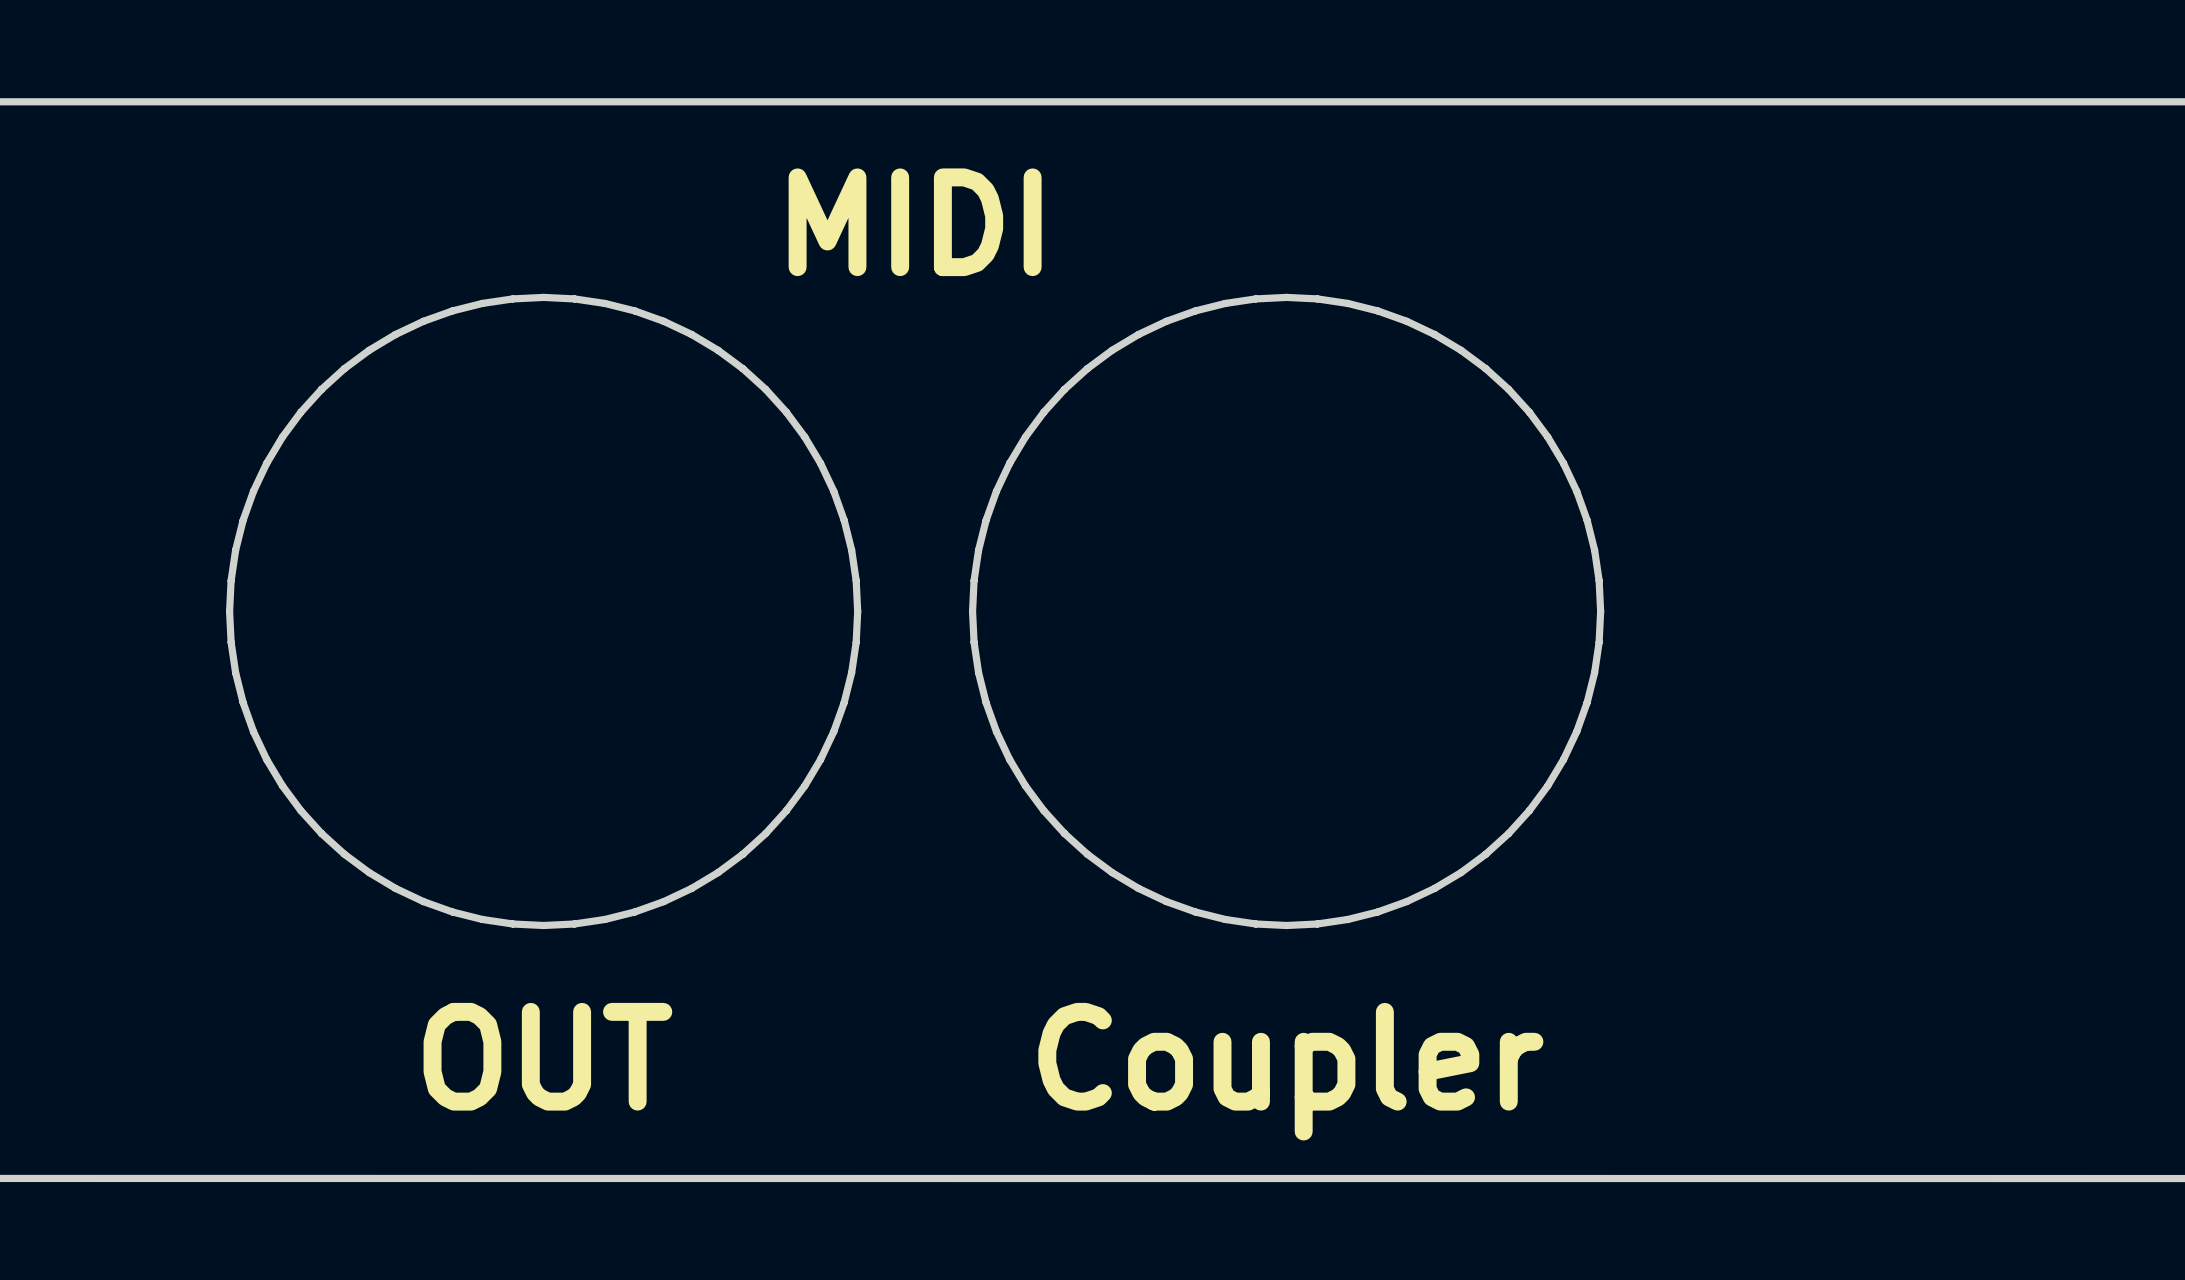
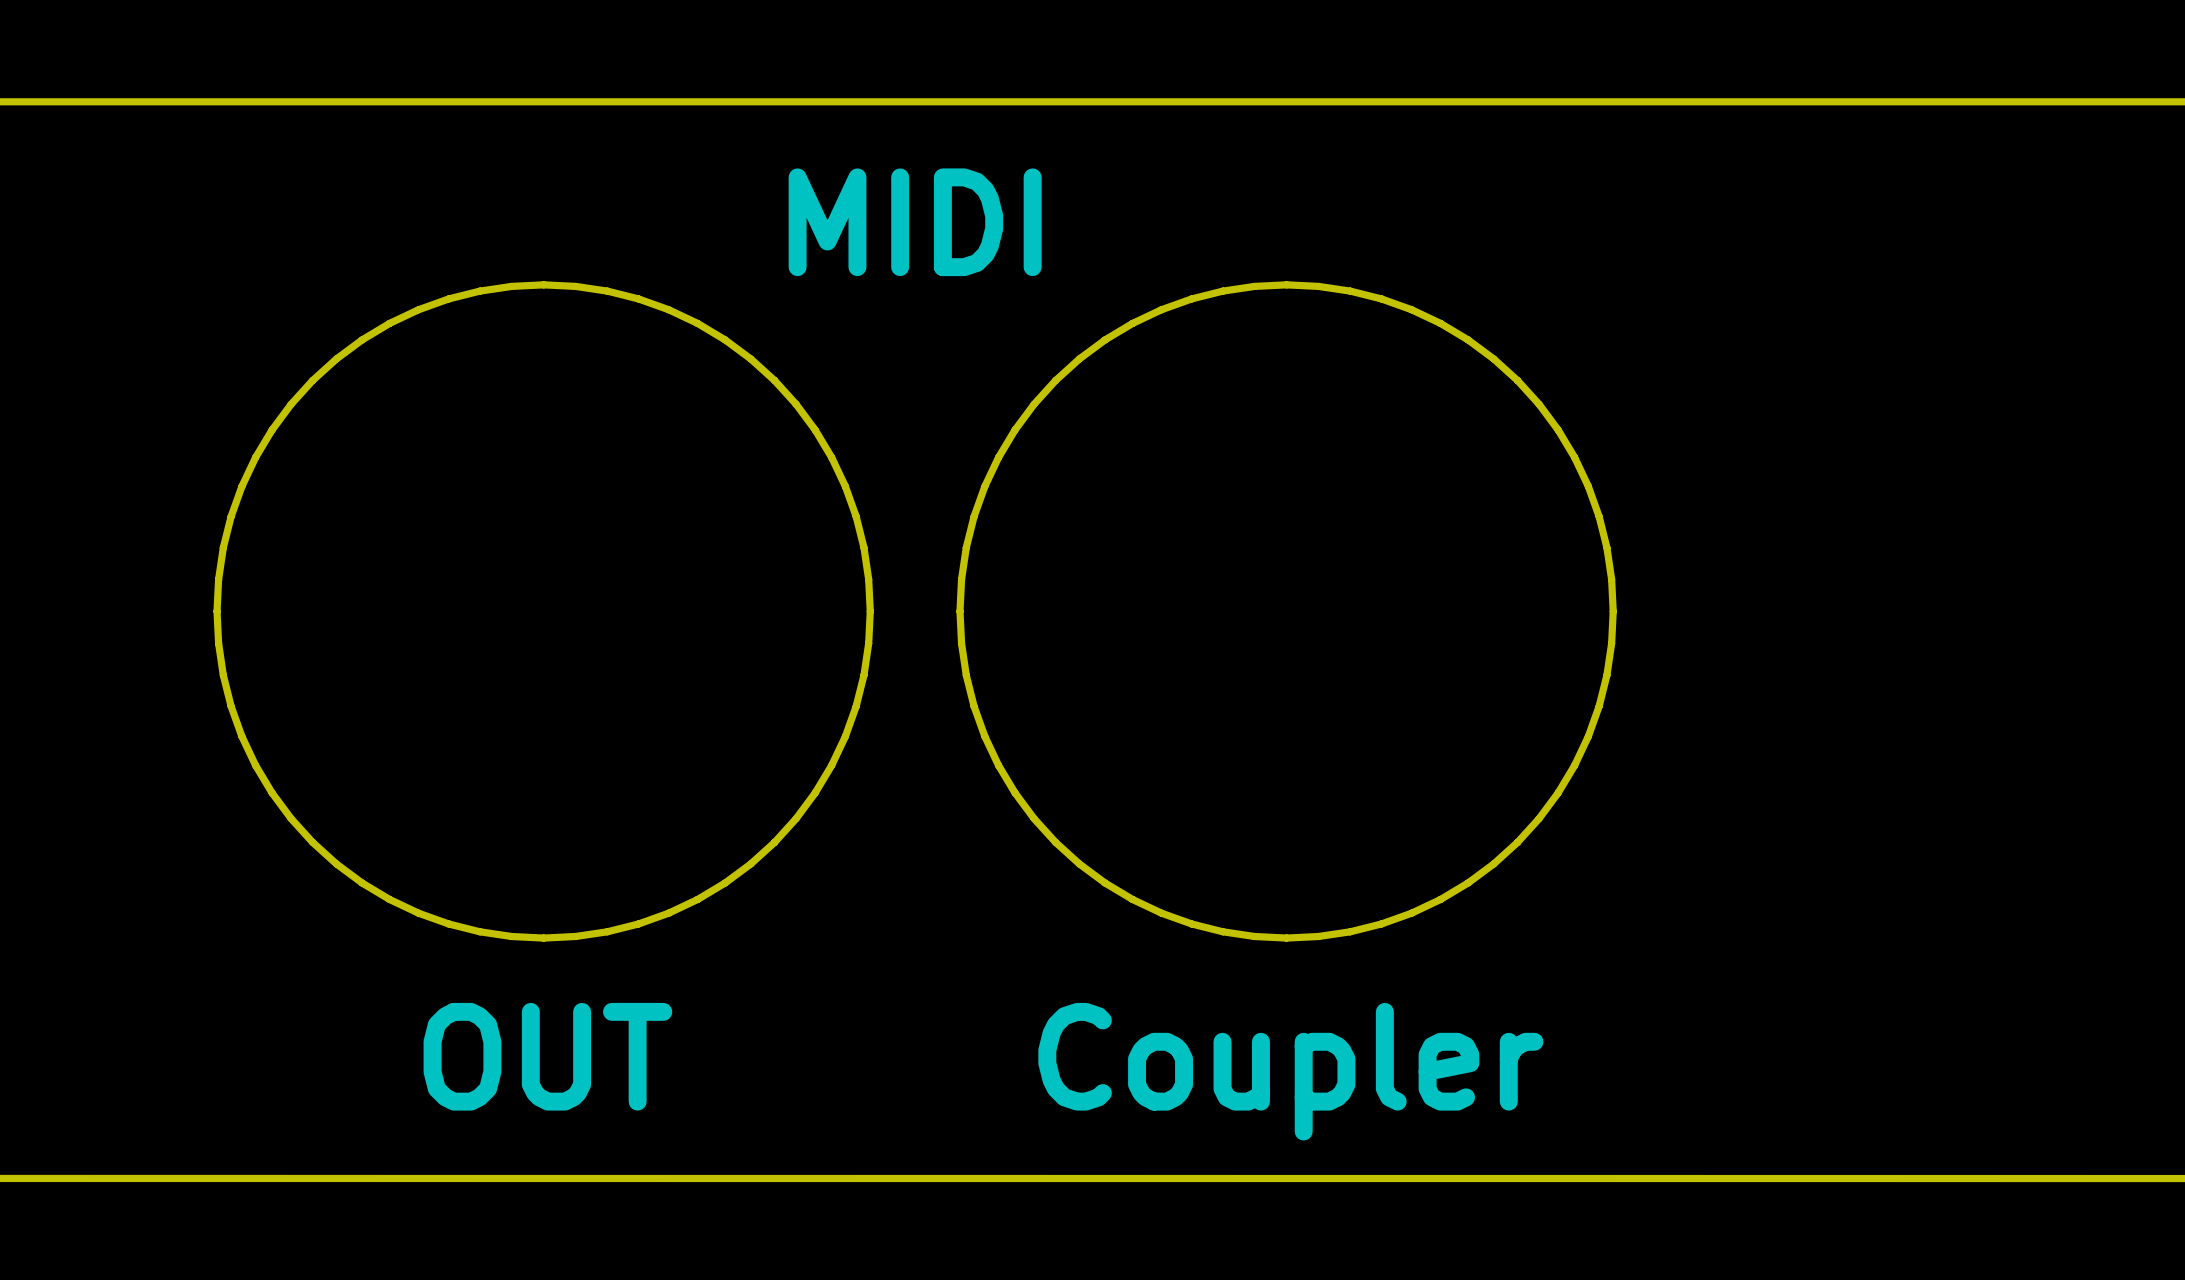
board edge: (543, 297) (574, 298) (604, 303) (634, 310) (663, 321) (691, 334) (718, 350) (742, 368) (765, 389) (786, 412) (804, 436) (820, 463) (833, 491) (844, 520) (851, 550) (856, 580) (857, 611) (856, 642) (851, 672) (844, 702) (833, 731) (820, 759) (804, 785) (786, 810) (765, 833) (742, 854) (718, 872) (691, 888) (663, 901) (634, 911) (604, 919) (574, 923) (543, 925) (512, 923) (482, 919) (452, 911) (423, 901) (395, 888) (369, 872) (344, 854) (321, 833) (300, 810) (282, 785) (266, 759) (253, 731) (243, 702) (235, 672) (231, 642) (229, 611) (231, 580) (235, 550) (243, 520) (253, 491) (266, 463) (282, 436) (300, 412) (321, 389) (344, 368) (369, 350) (395, 334) (423, 321) (452, 310) (482, 303) (512, 298) (543, 297) -> (543, 284) (511, 286) (479, 291) (448, 298) (418, 309) (389, 323) (362, 339) (336, 358) (312, 380) (291, 404) (272, 430) (255, 457) (241, 486) (231, 516) (223, 547) (218, 579) (217, 611) (218, 643) (223, 675) (231, 706) (241, 736) (255, 765) (272, 792) (291, 818) (312, 842) (336, 863) (362, 883) (389, 899) (418, 913) (448, 924) (479, 931) (511, 936) (543, 938) (575, 936) (607, 931) (638, 924) (668, 913) (697, 899) (725, 883) (750, 863) (774, 842) (796, 818) (815, 792) (831, 765) (845, 736) (856, 706) (863, 675) (868, 643) (870, 611) (868, 579) (863, 547) (856, 516) (845, 486) (831, 457) (815, 430) (796, 404) (774, 380) (750, 358) (725, 339) (697, 323) (668, 309) (638, 298) (607, 291) (575, 286) (543, 284)
board edge: (1286, 297) (1317, 298) (1347, 303) (1377, 310) (1406, 321) (1434, 334) (1461, 350) (1485, 368) (1508, 389) (1529, 412) (1547, 436) (1563, 463) (1576, 491) (1587, 520) (1594, 550) (1599, 580) (1600, 611) (1599, 642) (1594, 672) (1587, 702) (1576, 731) (1563, 759) (1547, 785) (1529, 810) (1508, 833) (1485, 854) (1461, 872) (1434, 888) (1406, 901) (1377, 911) (1347, 919) (1317, 923) (1286, 925) (1255, 923) (1225, 919) (1195, 911) (1166, 901) (1138, 888) (1112, 872) (1087, 854) (1064, 833) (1043, 810) (1025, 785) (1009, 759) (996, 731) (986, 702) (978, 672) (974, 642) (972, 611) (974, 580) (978, 550) (986, 520) (996, 491) (1009, 463) (1025, 436) (1043, 412) (1064, 389) (1087, 368) (1112, 350) (1138, 334) (1166, 321) (1195, 310) (1225, 303) (1255, 298) (1286, 297) -> (1286, 284) (1254, 286) (1222, 291) (1191, 298) (1161, 309) (1132, 323) (1105, 339) (1079, 358) (1055, 380) (1034, 404) (1015, 430) (998, 457) (984, 486) (974, 516) (966, 547) (961, 579) (959, 611) (961, 643) (966, 675) (974, 706) (984, 736) (998, 765) (1015, 792) (1034, 818) (1055, 842) (1079, 863) (1105, 883) (1132, 899) (1161, 913) (1191, 924) (1222, 931) (1254, 936) (1286, 938) (1318, 936) (1350, 931) (1381, 924) (1411, 913) (1440, 899) (1468, 883) (1493, 863) (1517, 842) (1539, 818) (1558, 792) (1574, 765) (1588, 736) (1599, 706) (1606, 675) (1611, 643) (1613, 611) (1611, 579) (1606, 547) (1599, 516) (1588, 486) (1574, 457) (1558, 430) (1539, 404) (1517, 380) (1493, 358) (1468, 339) (1440, 323) (1411, 309) (1381, 298) (1350, 291) (1318, 286) (1286, 284)

